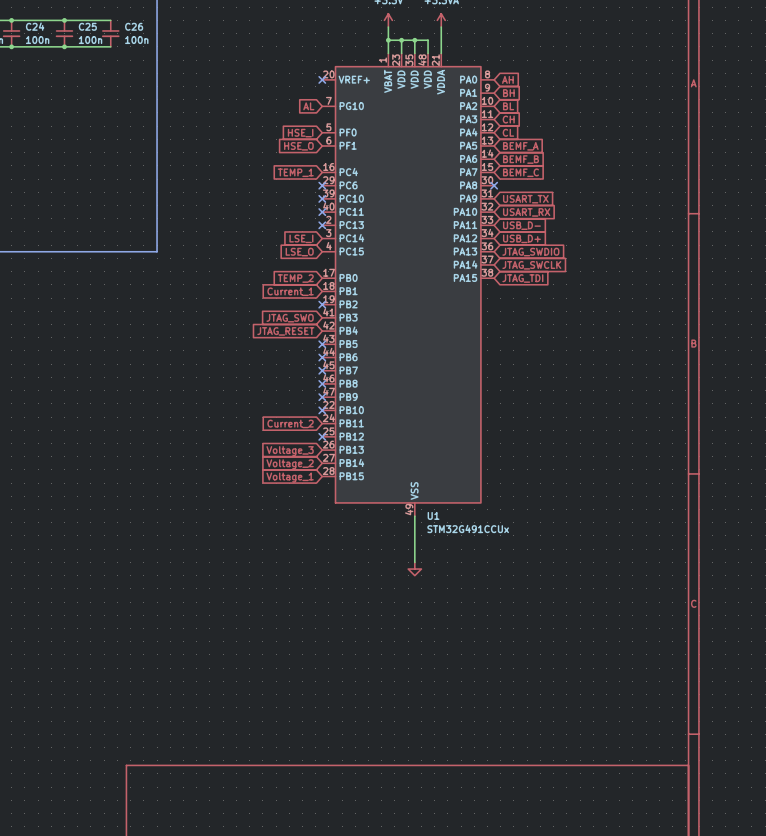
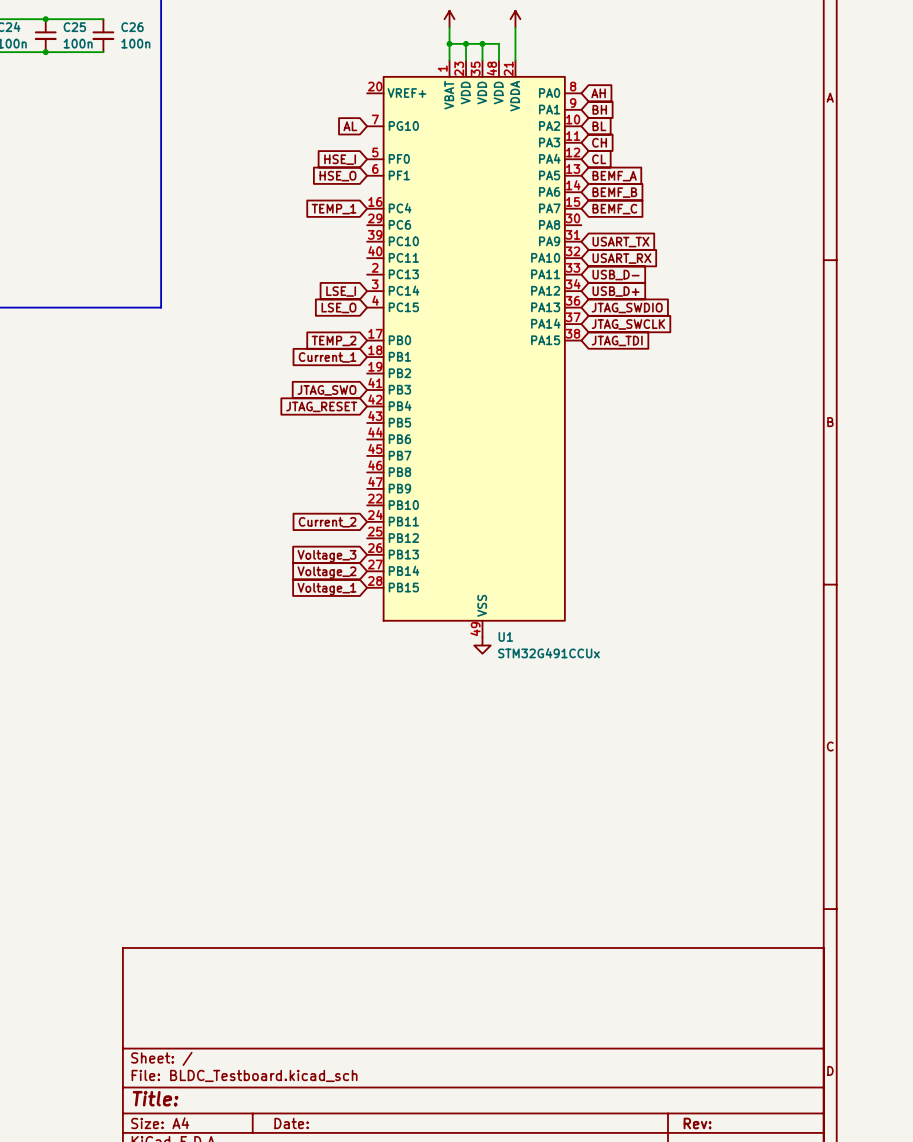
no-connect mark: (322, 79) -> none
no-connect mark: (322, 185) -> none
no-connect mark: (494, 185) -> none
no-connect mark: (322, 198) -> none
no-connect mark: (322, 212) -> none
no-connect mark: (322, 225) -> none
no-connect mark: (322, 304) -> none
no-connect mark: (322, 344) -> none
no-connect mark: (322, 357) -> none
no-connect mark: (322, 370) -> none
no-connect mark: (322, 383) -> none
no-connect mark: (322, 397) -> none
no-connect mark: (322, 410) -> none
no-connect mark: (322, 436) -> none
wire: (414, 516) (414, 562) -> none
power symbol position: (414, 569) -> (482, 645)

